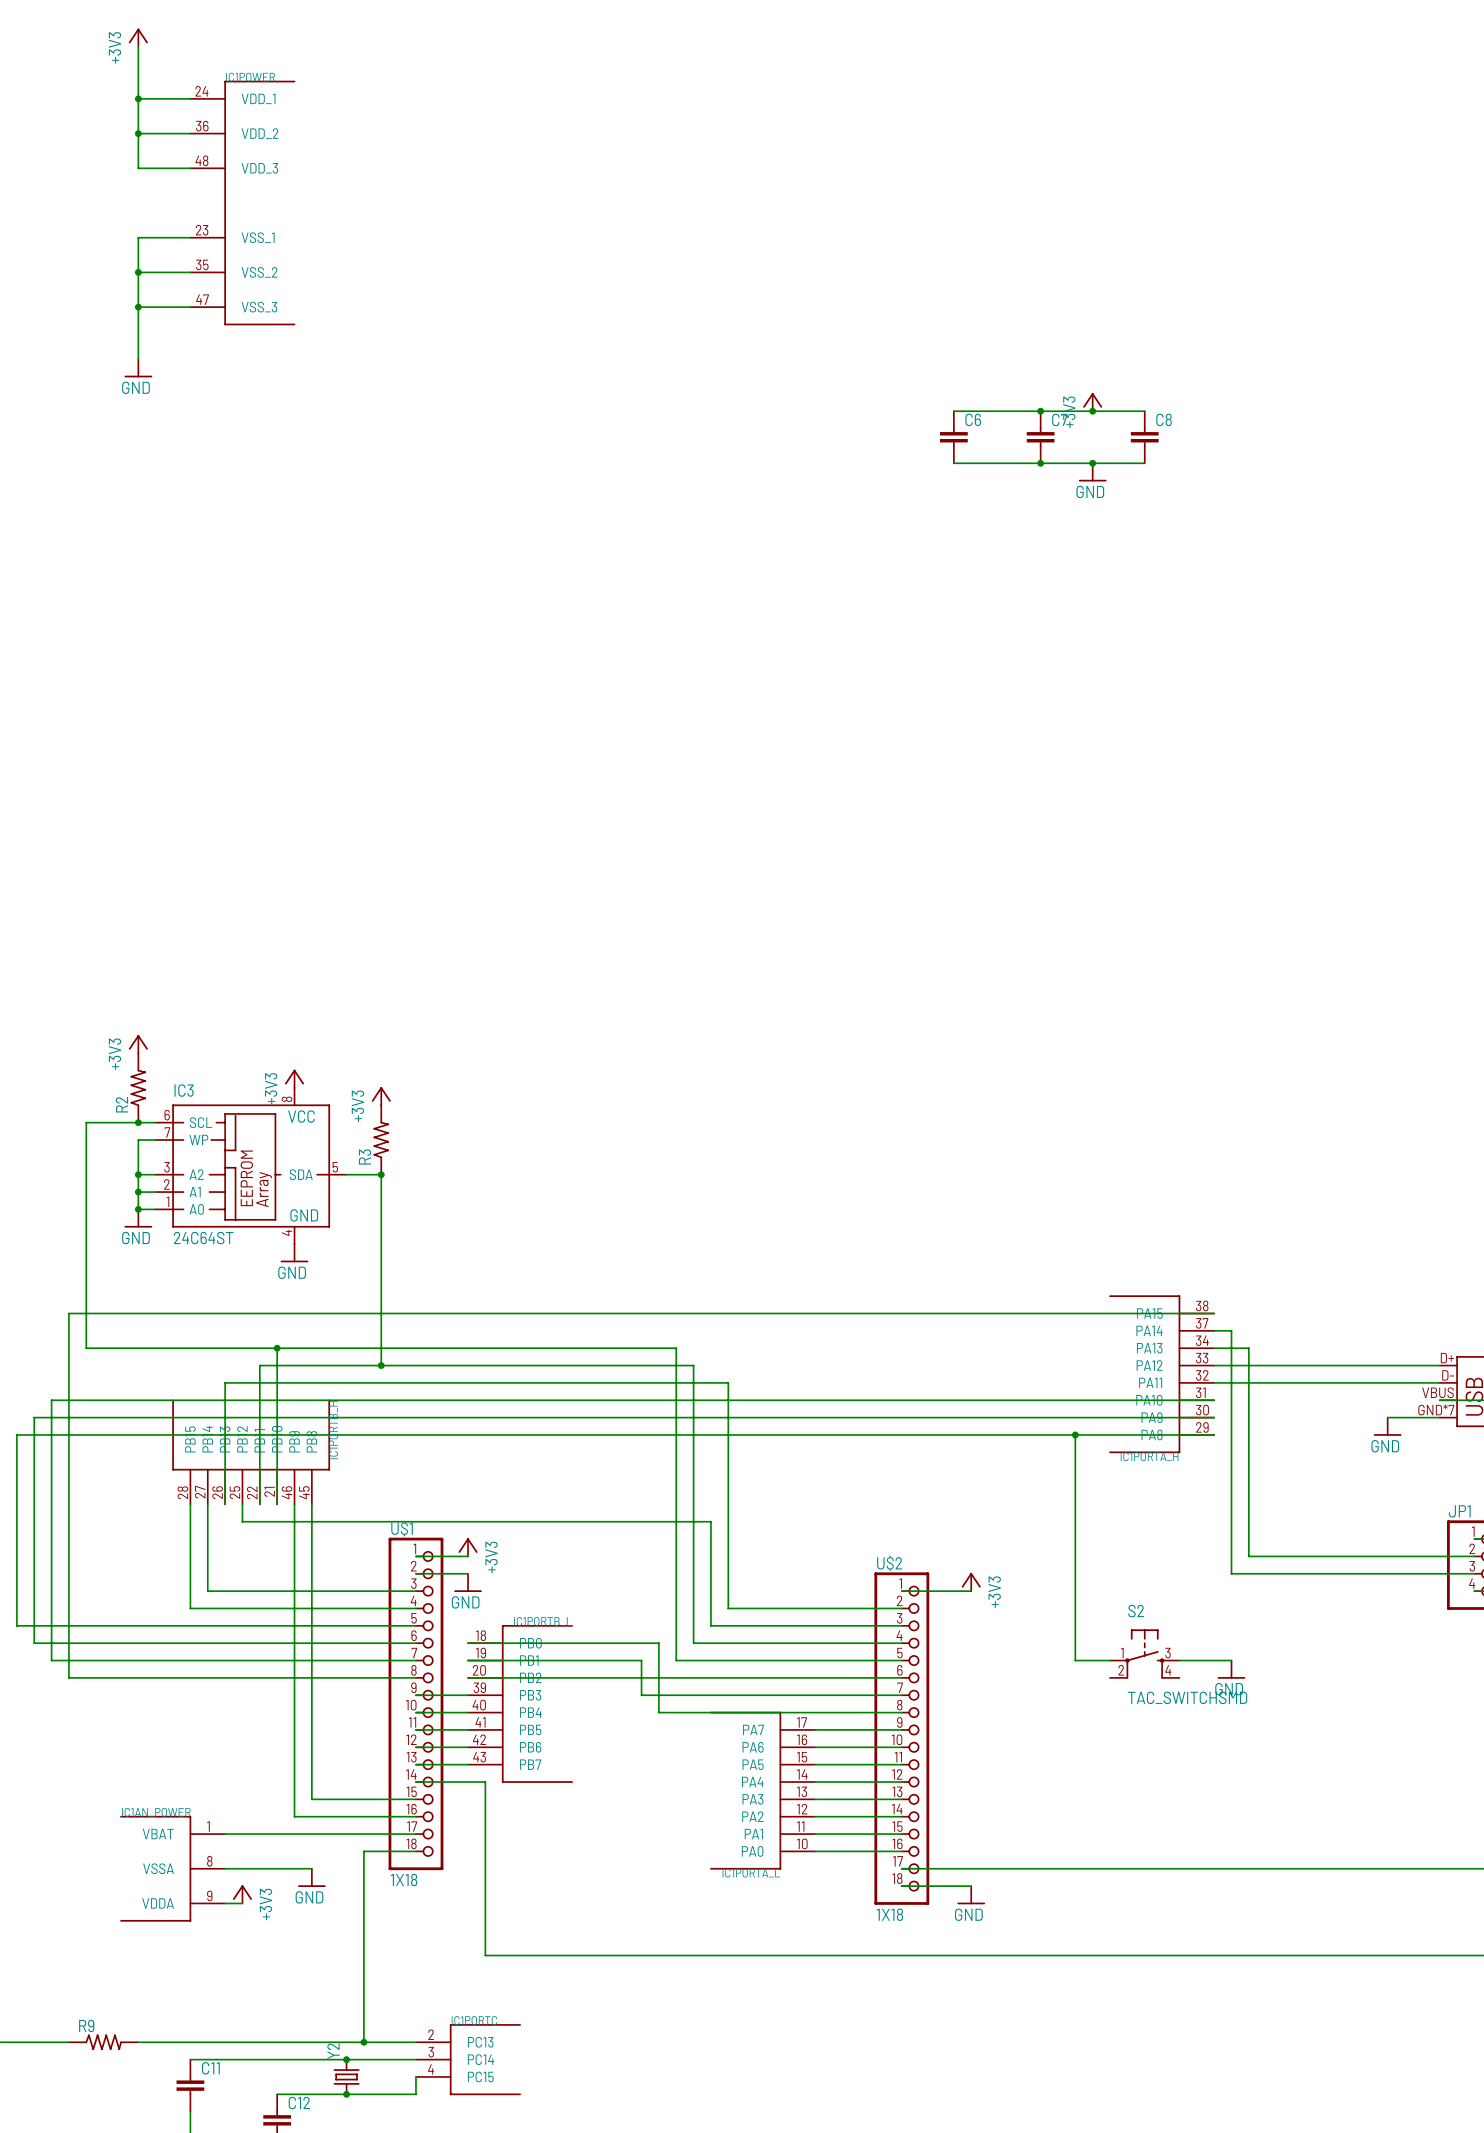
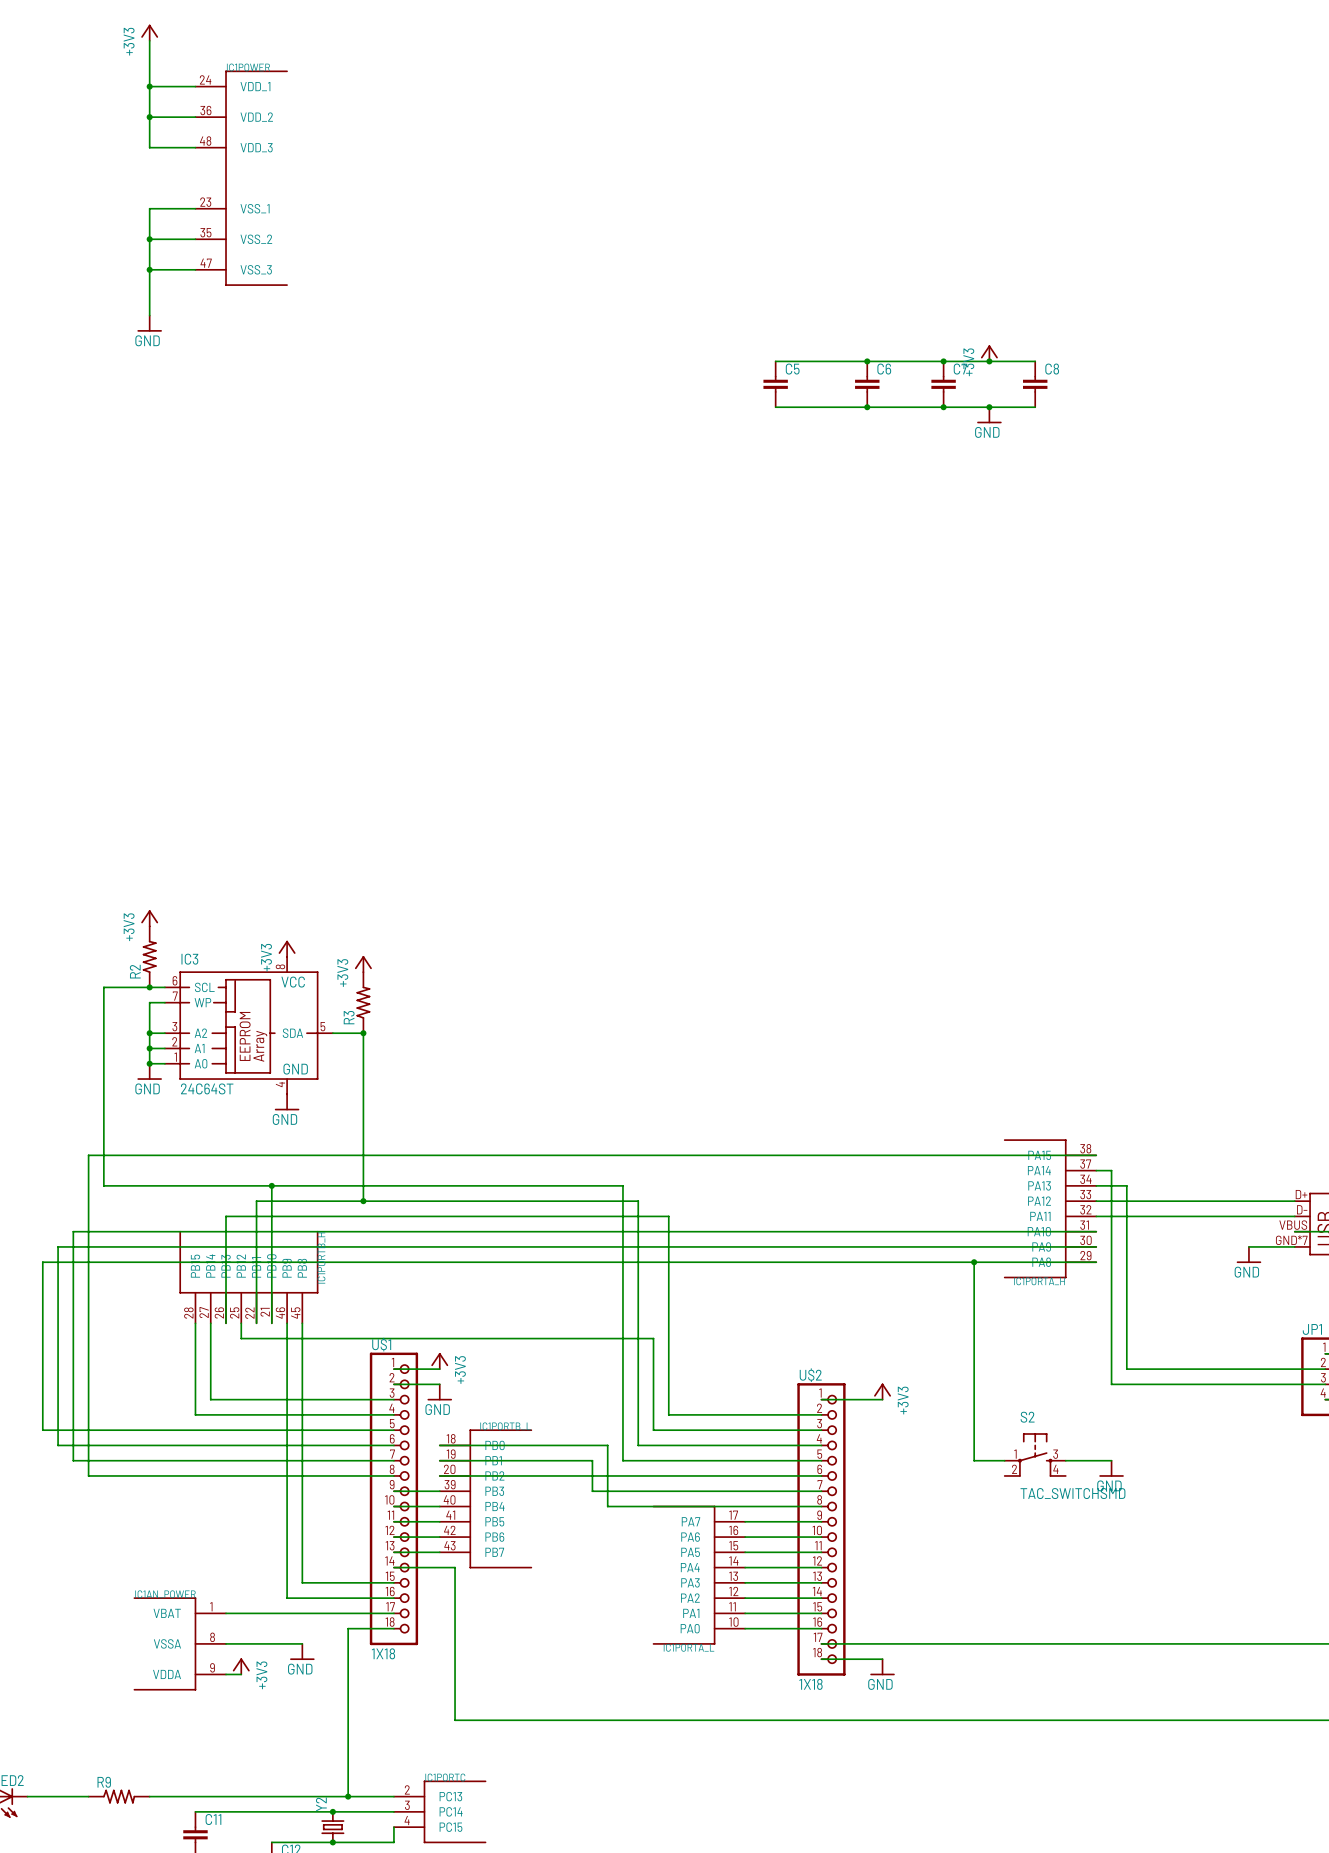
wire: none -> (775, 361) (867, 361)
junction: none -> (867, 361)
C5: none -> (775, 384)
wire: none -> (775, 407) (867, 407)
junction: none -> (867, 407)

